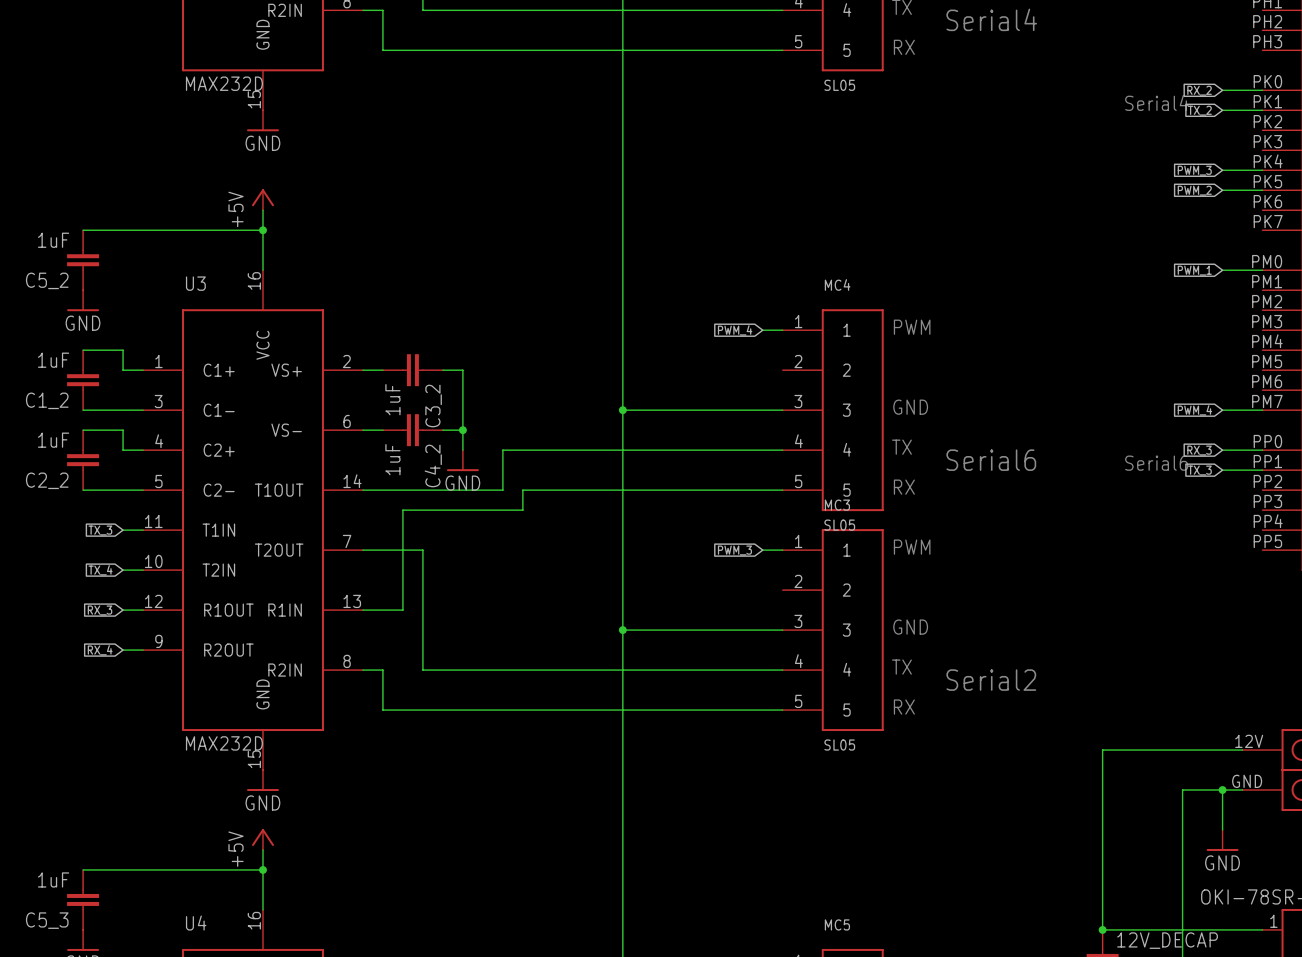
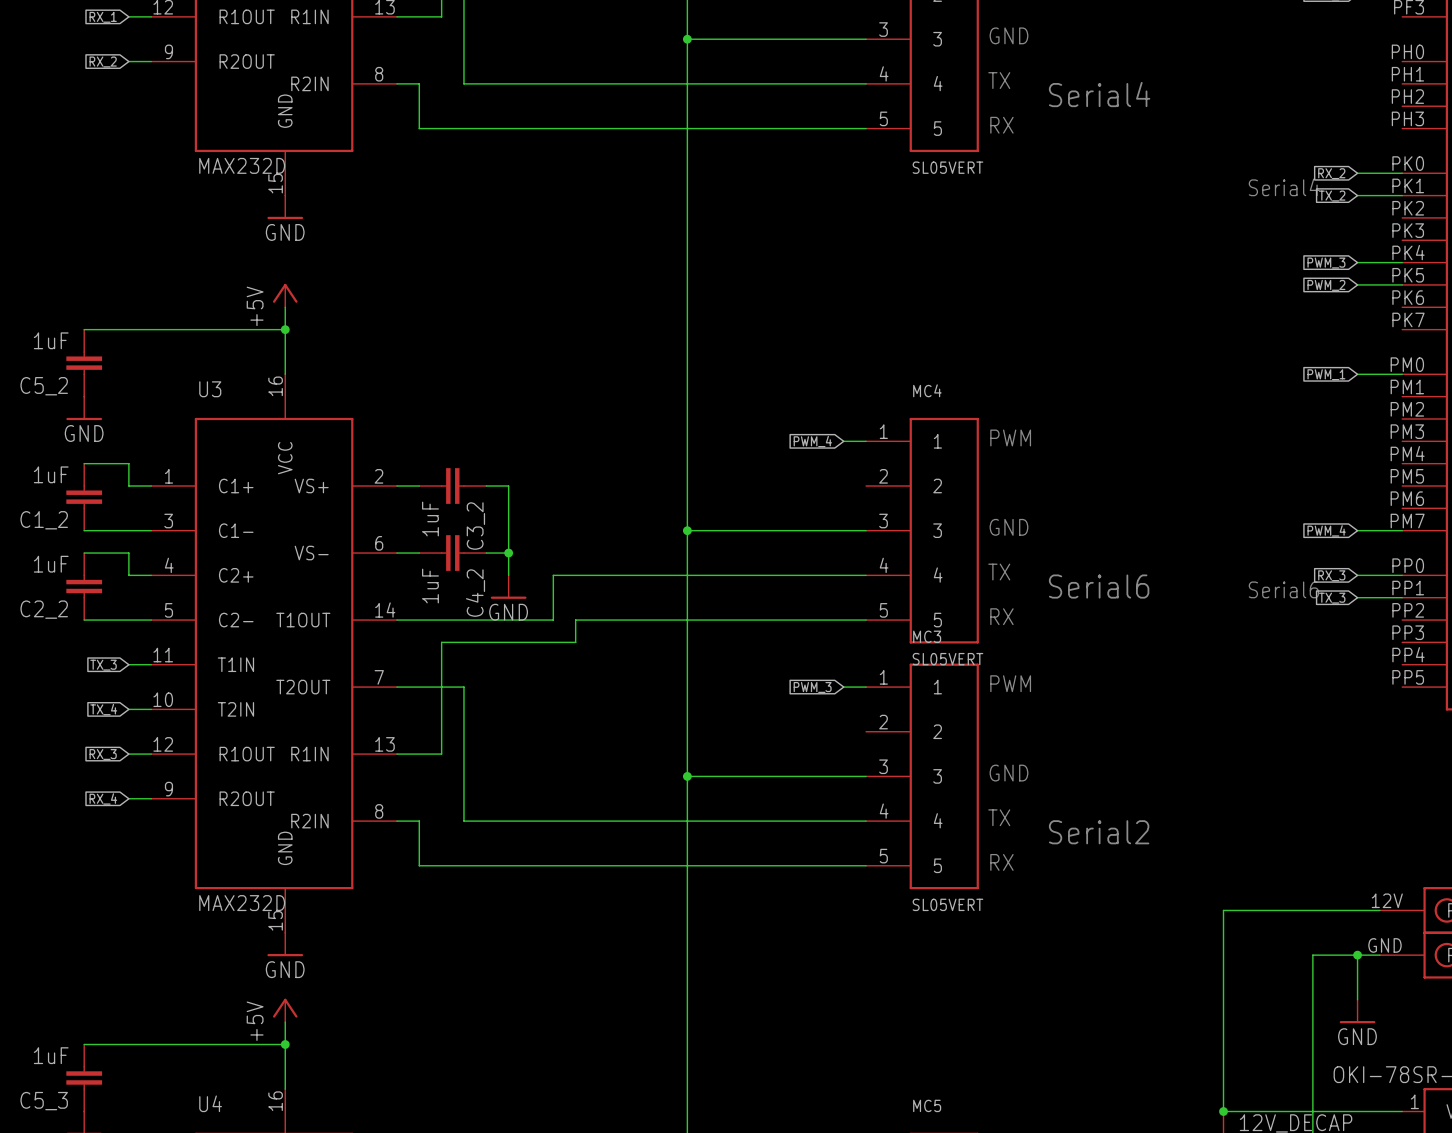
part value: SL05 (839, 85) -> SL05VERT (947, 167)
MC4 value: SL05 (839, 525) -> SL05VERT (947, 659)
MC3 value: SL05 (839, 745) -> SL05VERT (947, 904)

